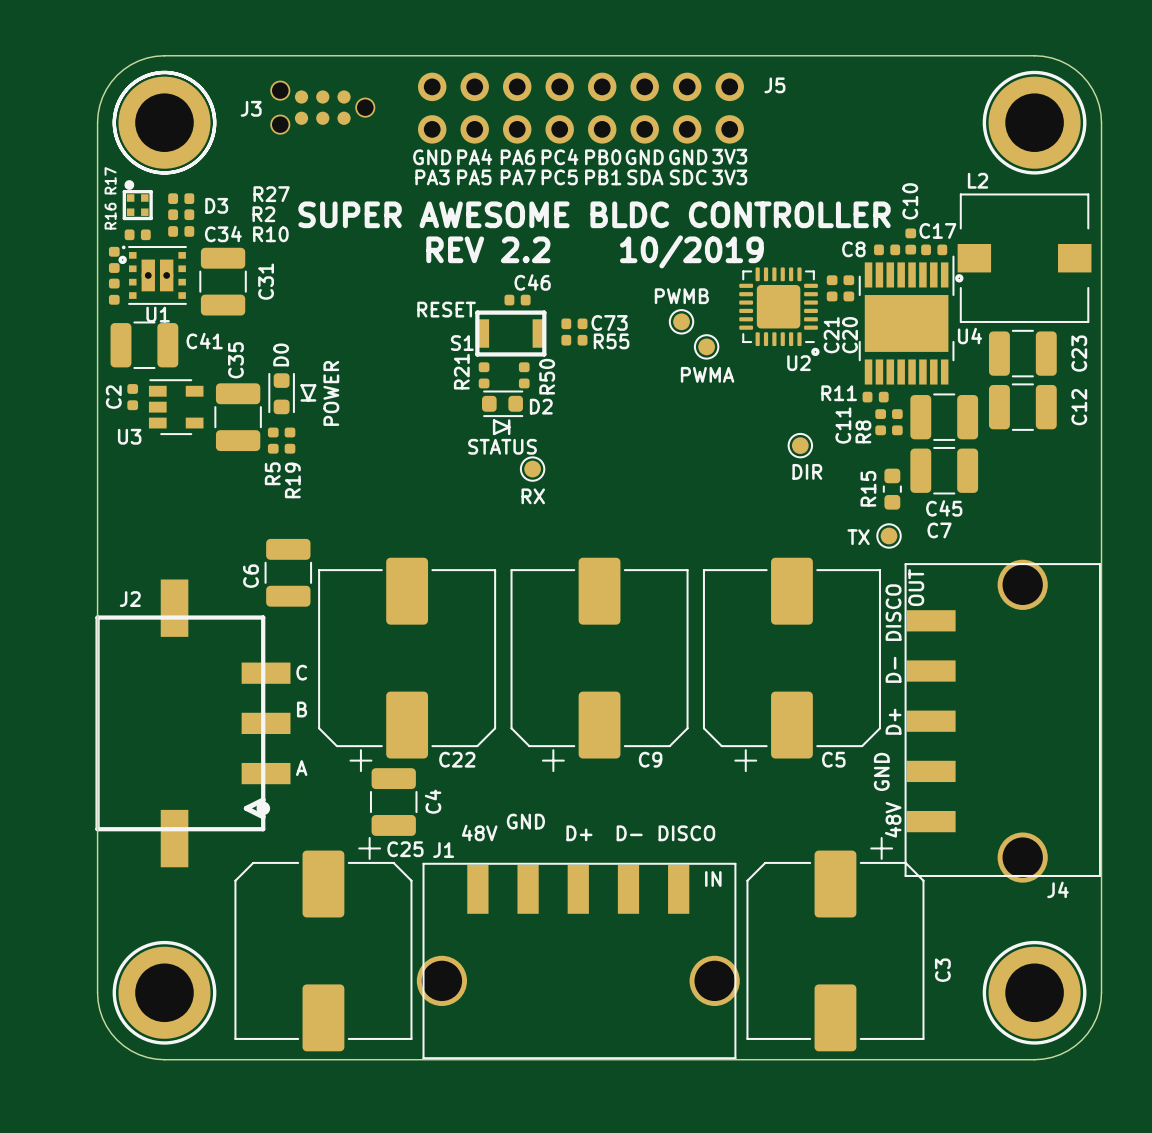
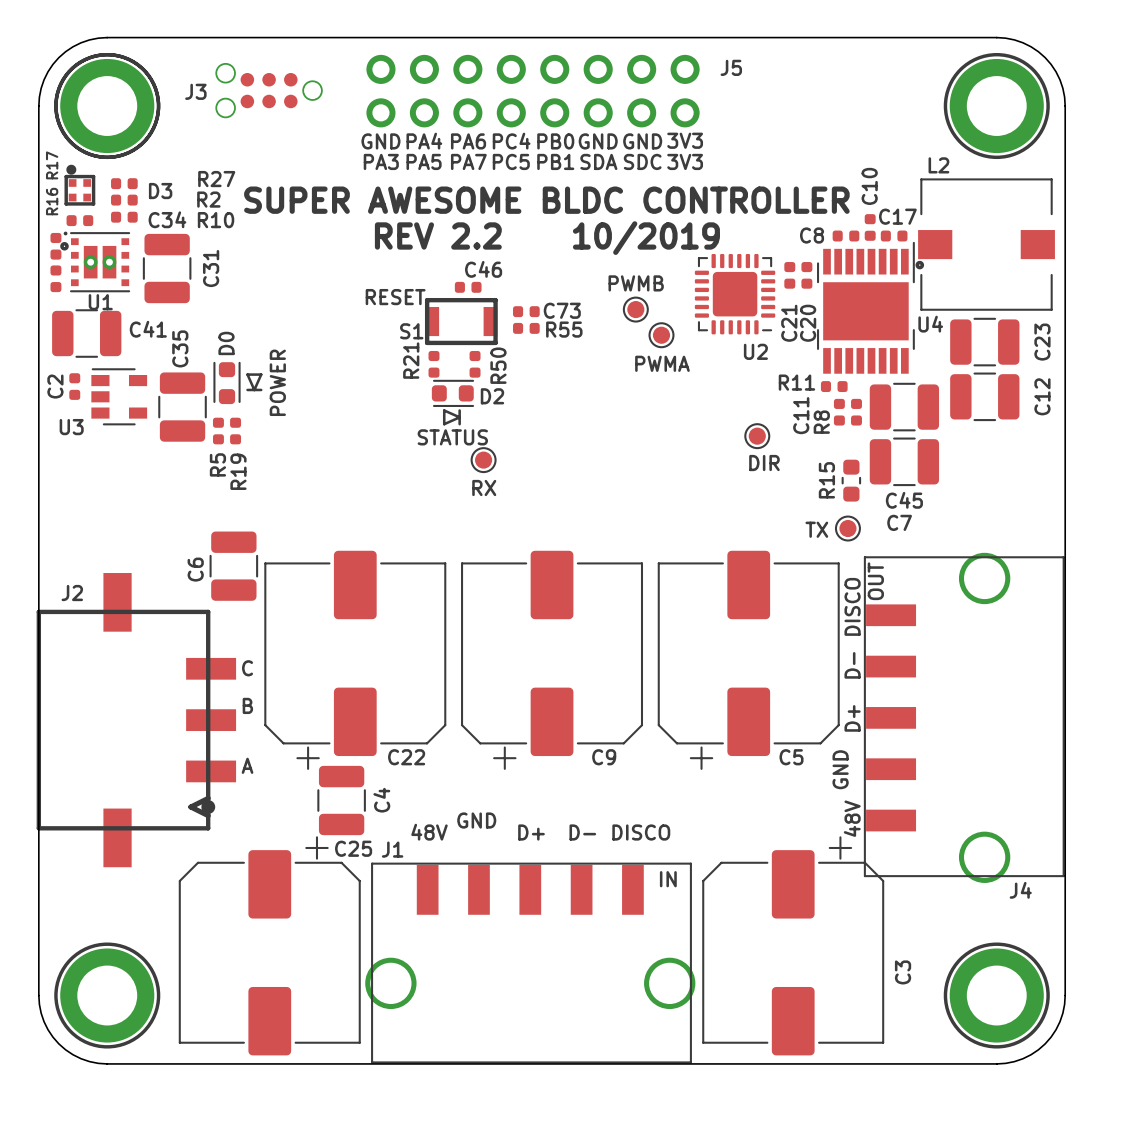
drawing: [811, 347, 820, 357] -> none

